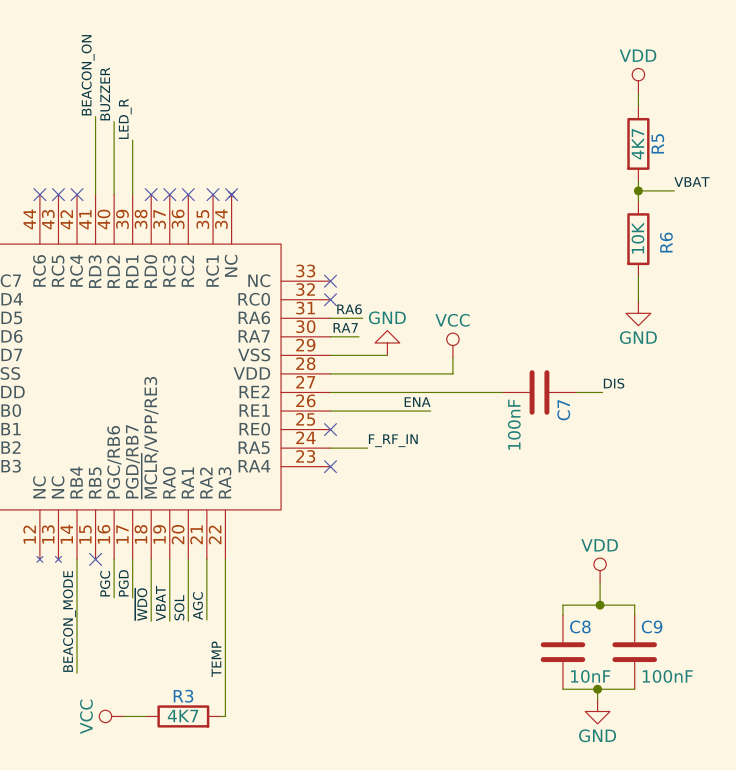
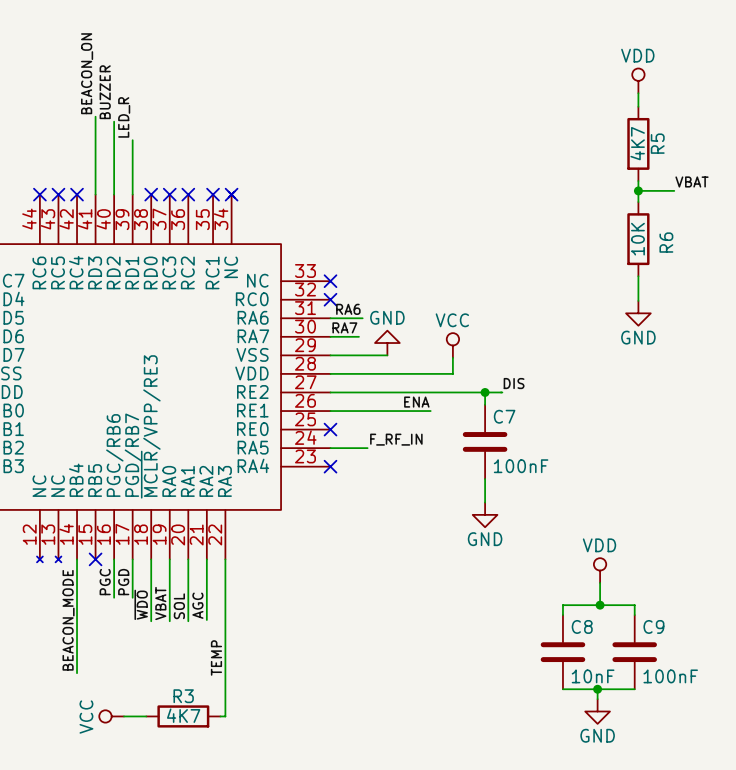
label position: DIS (614, 383) -> DIS (514, 383)
wire: none -> (485, 392) (485, 404)
junction: none -> (485, 392)
C7 rotation: 0° (539, 392) -> 90° clockwise (485, 441)
C7 position: (539, 392) -> (485, 441)
wire: (576, 392) (602, 392) -> none
C7 name position: C7 (563, 410) -> C7 (504, 416)
C7 value position: 100nF (514, 424) -> 100nF (521, 466)
wire: none -> (485, 479) (485, 502)
power symbol: none -> GND (485, 514)

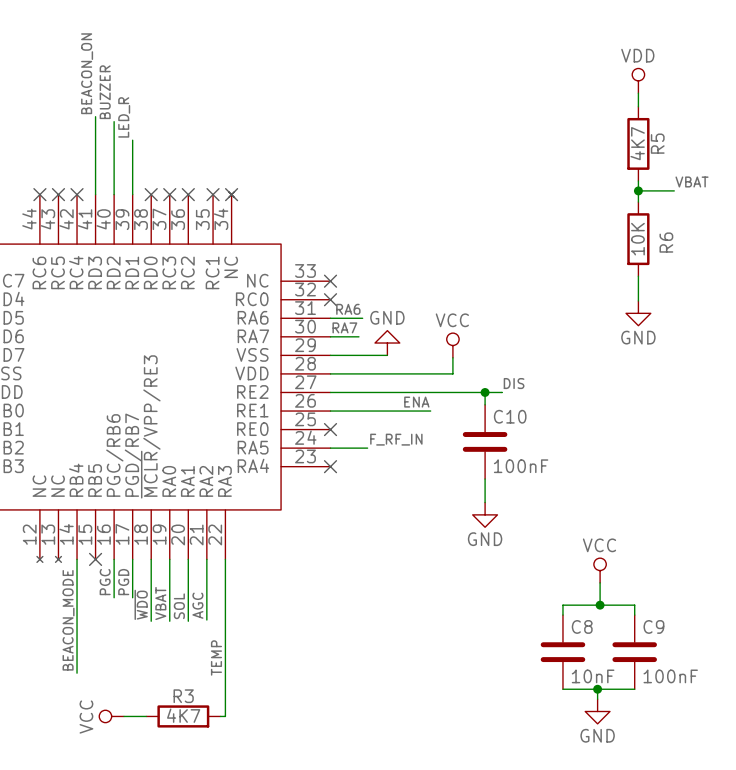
C7 name: C7 (504, 416) -> C10 (510, 416)
power symbol: VDD (600, 570) -> VCC (600, 570)

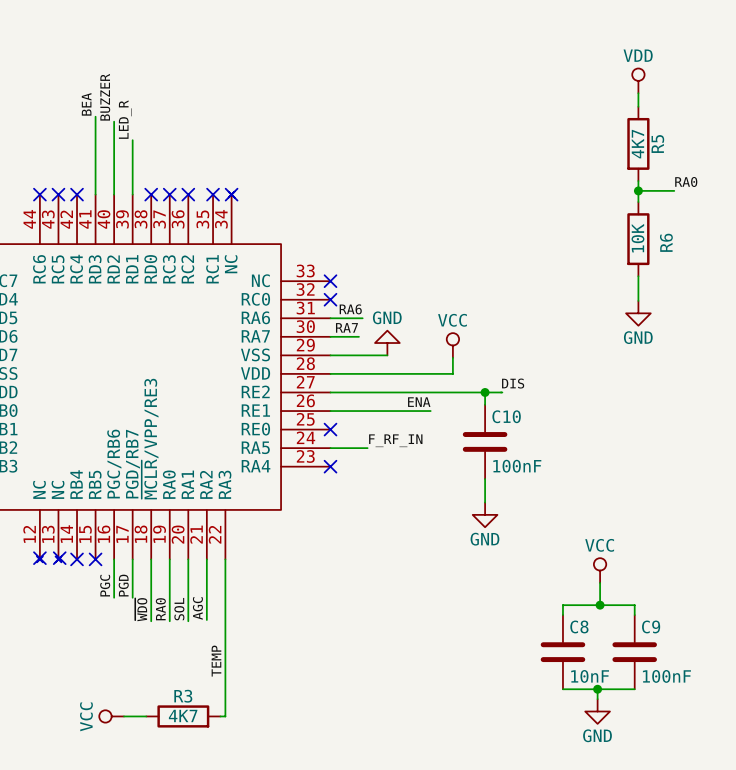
label: BEACON_ON (87, 73) -> BEA (86, 104)
label: VBAT (692, 181) -> RA0 (686, 181)
no-connect mark: none -> (39, 558)
no-connect mark: none -> (59, 558)
wire: (77, 559) (77, 673) -> none
no-connect mark: none -> (77, 559)
label: VBAT (160, 603) -> RA0 (160, 609)
label: BEACON_MODE (68, 620) -> none

